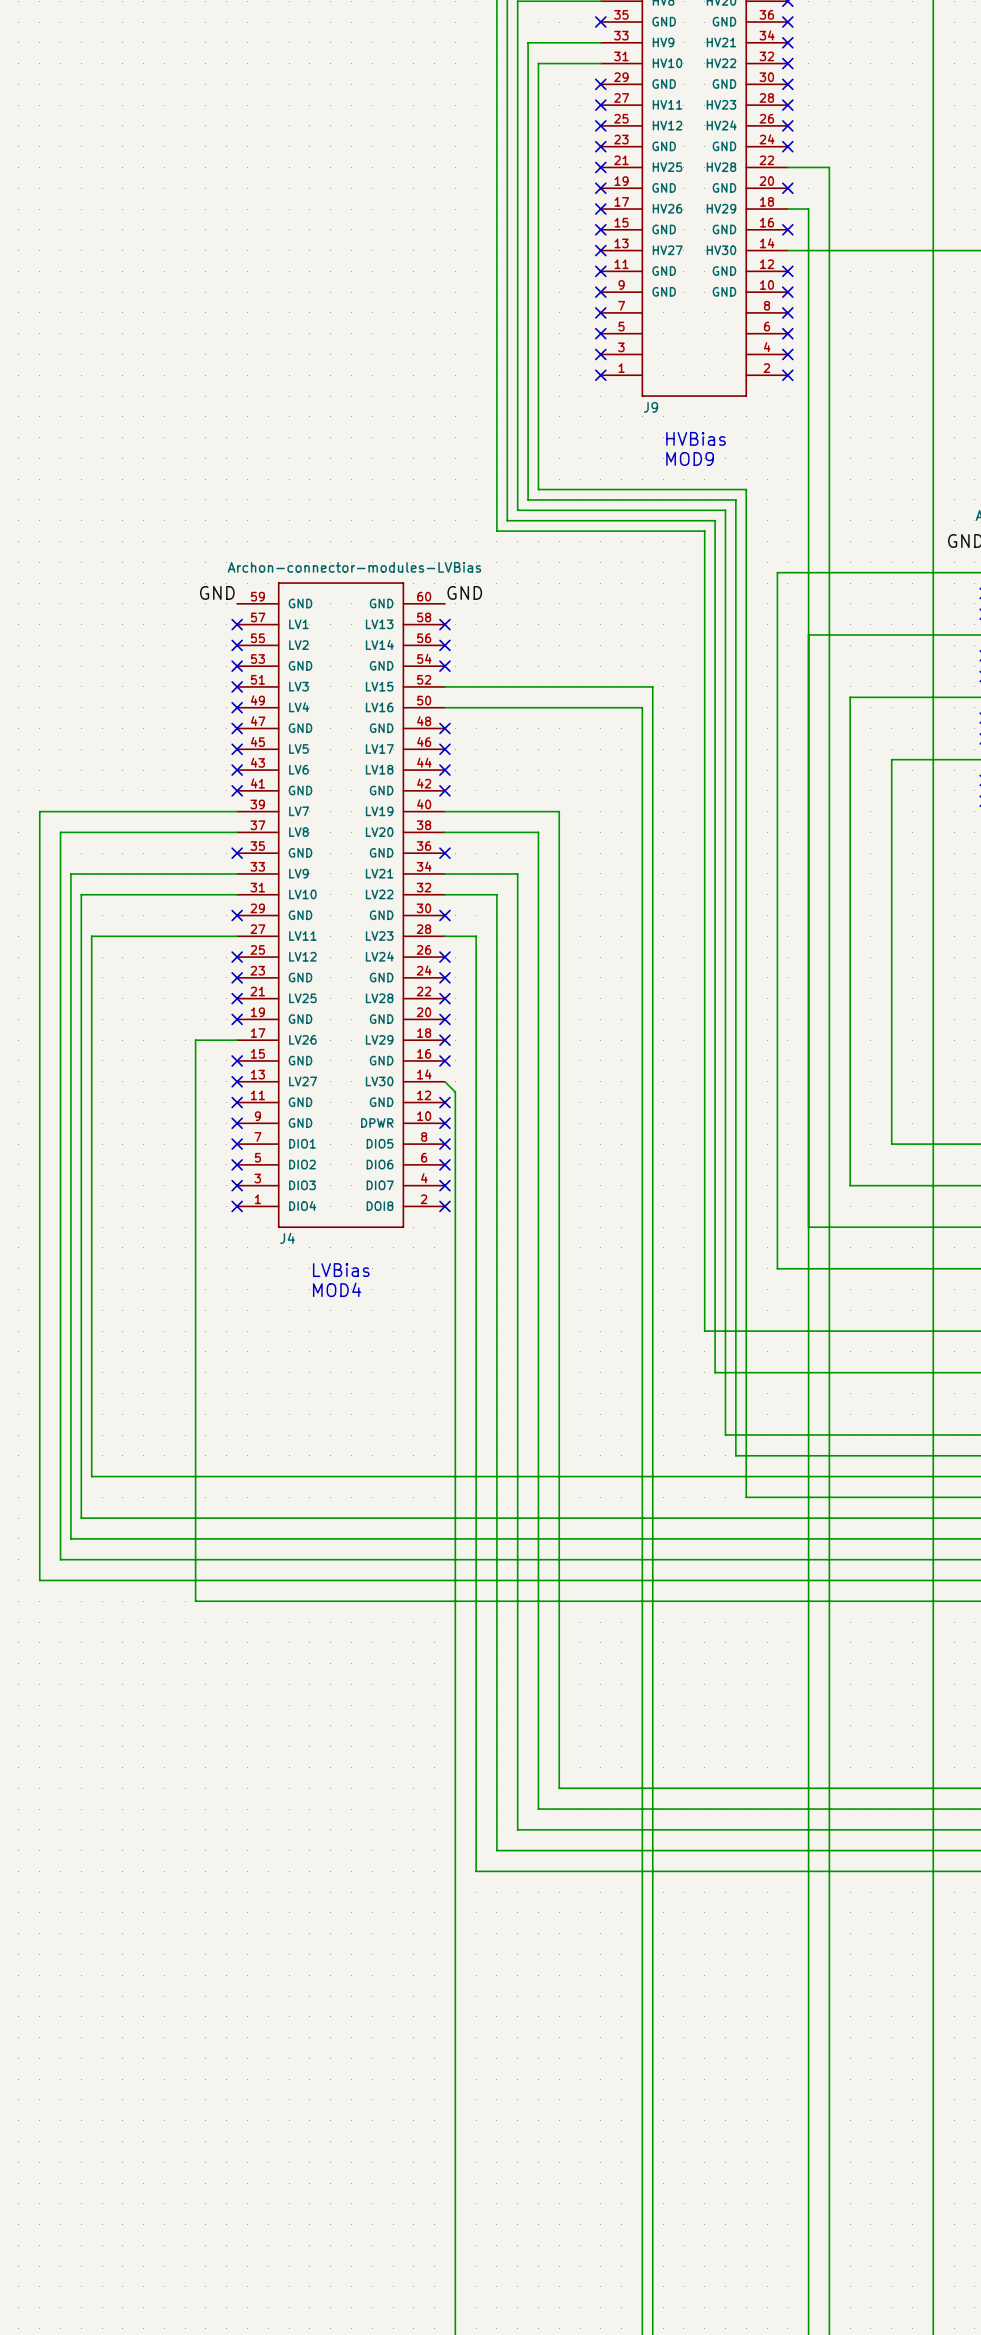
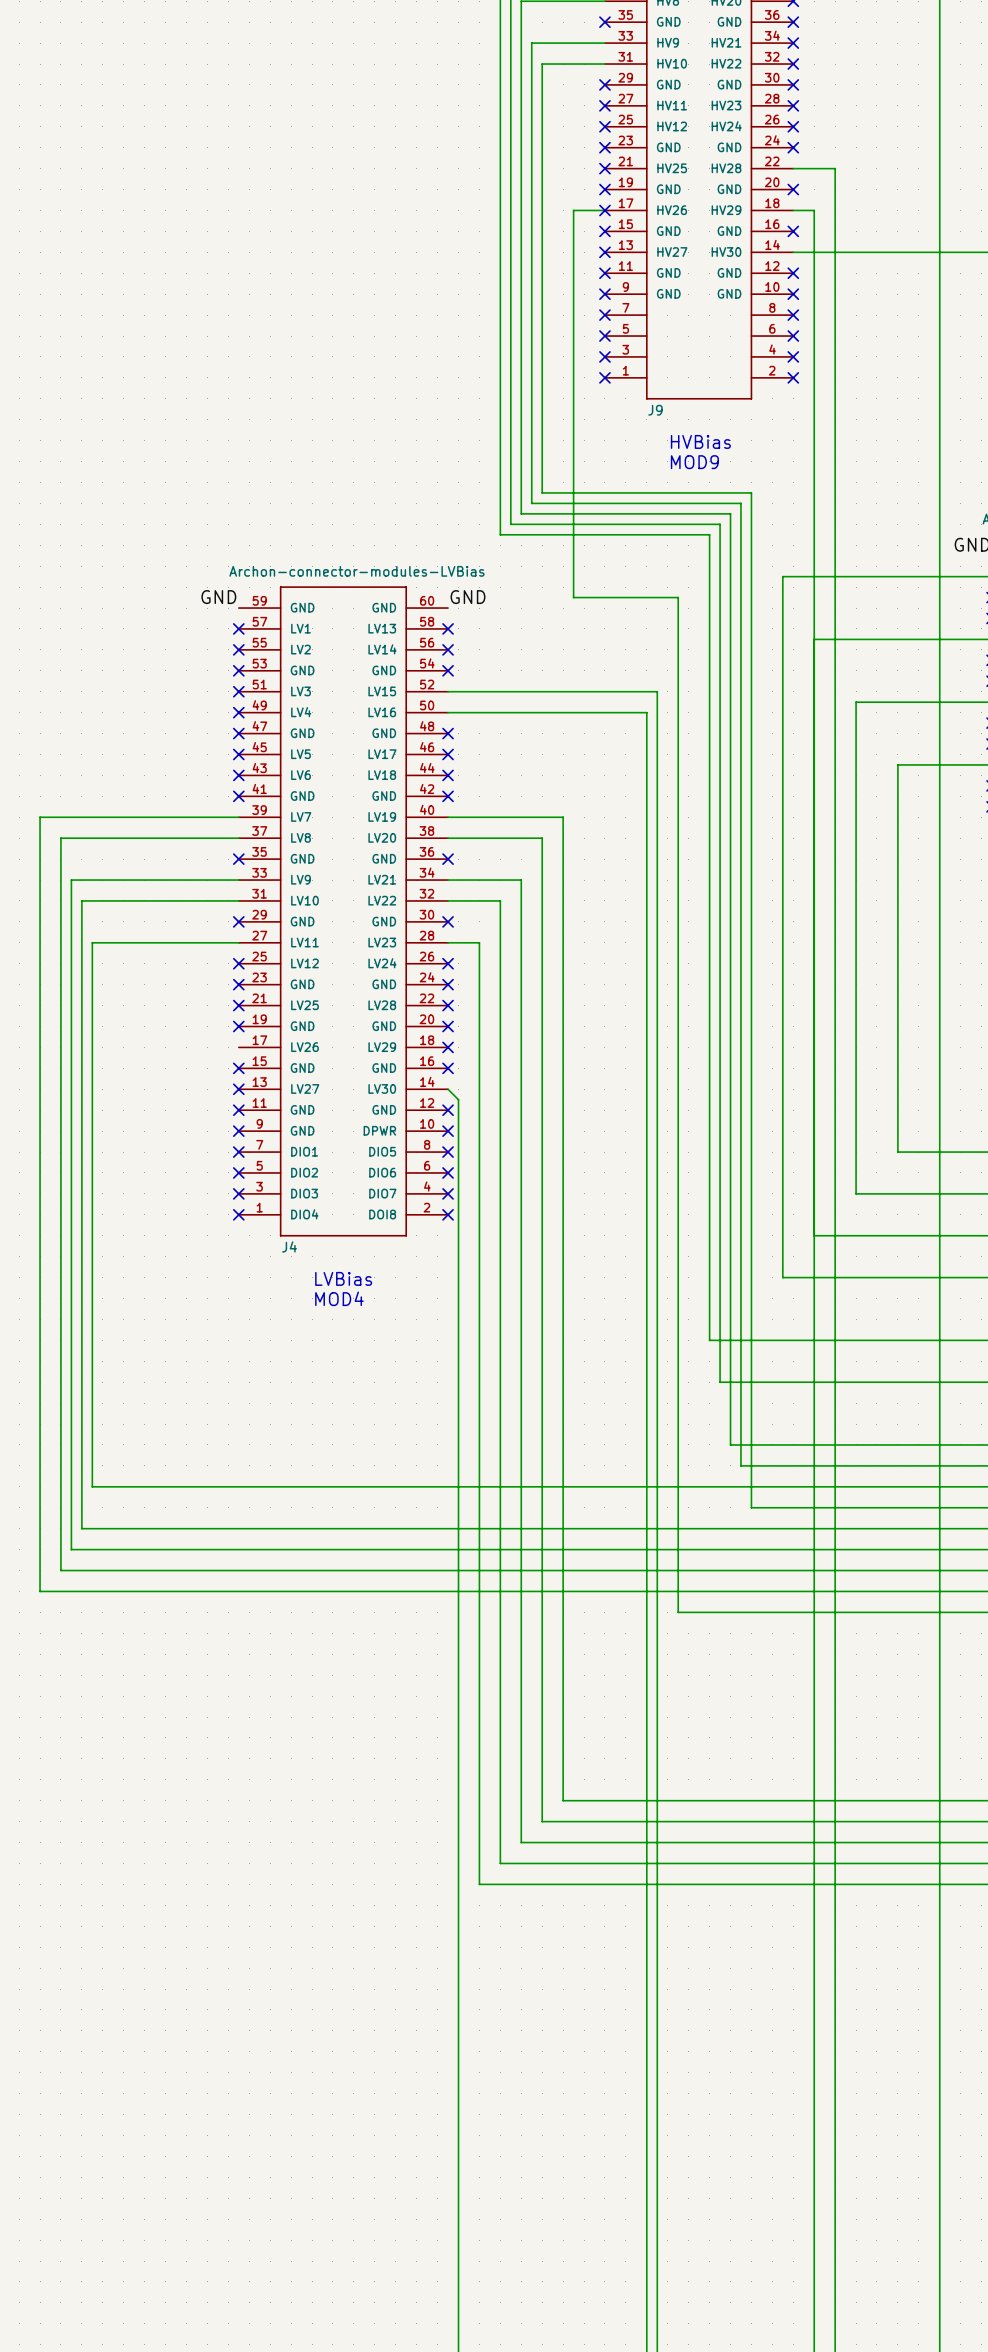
wire: (237, 1040) (195, 1040) (195, 1601) (673, 1601) -> (604, 210) (573, 210) (573, 597) (678, 597) (678, 1612)

